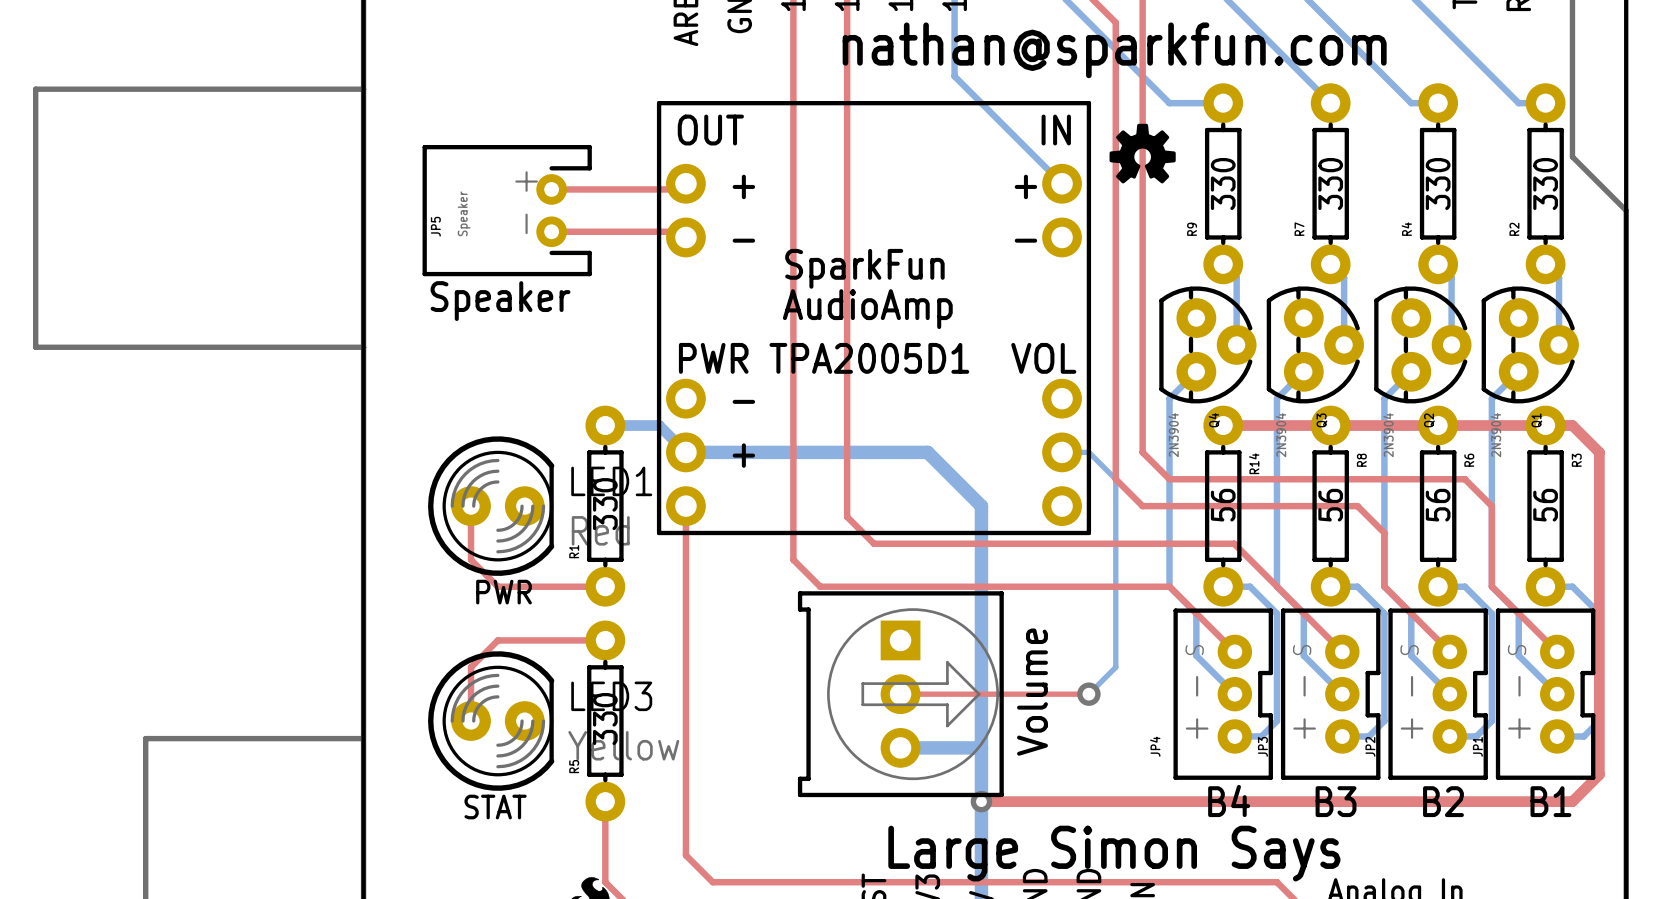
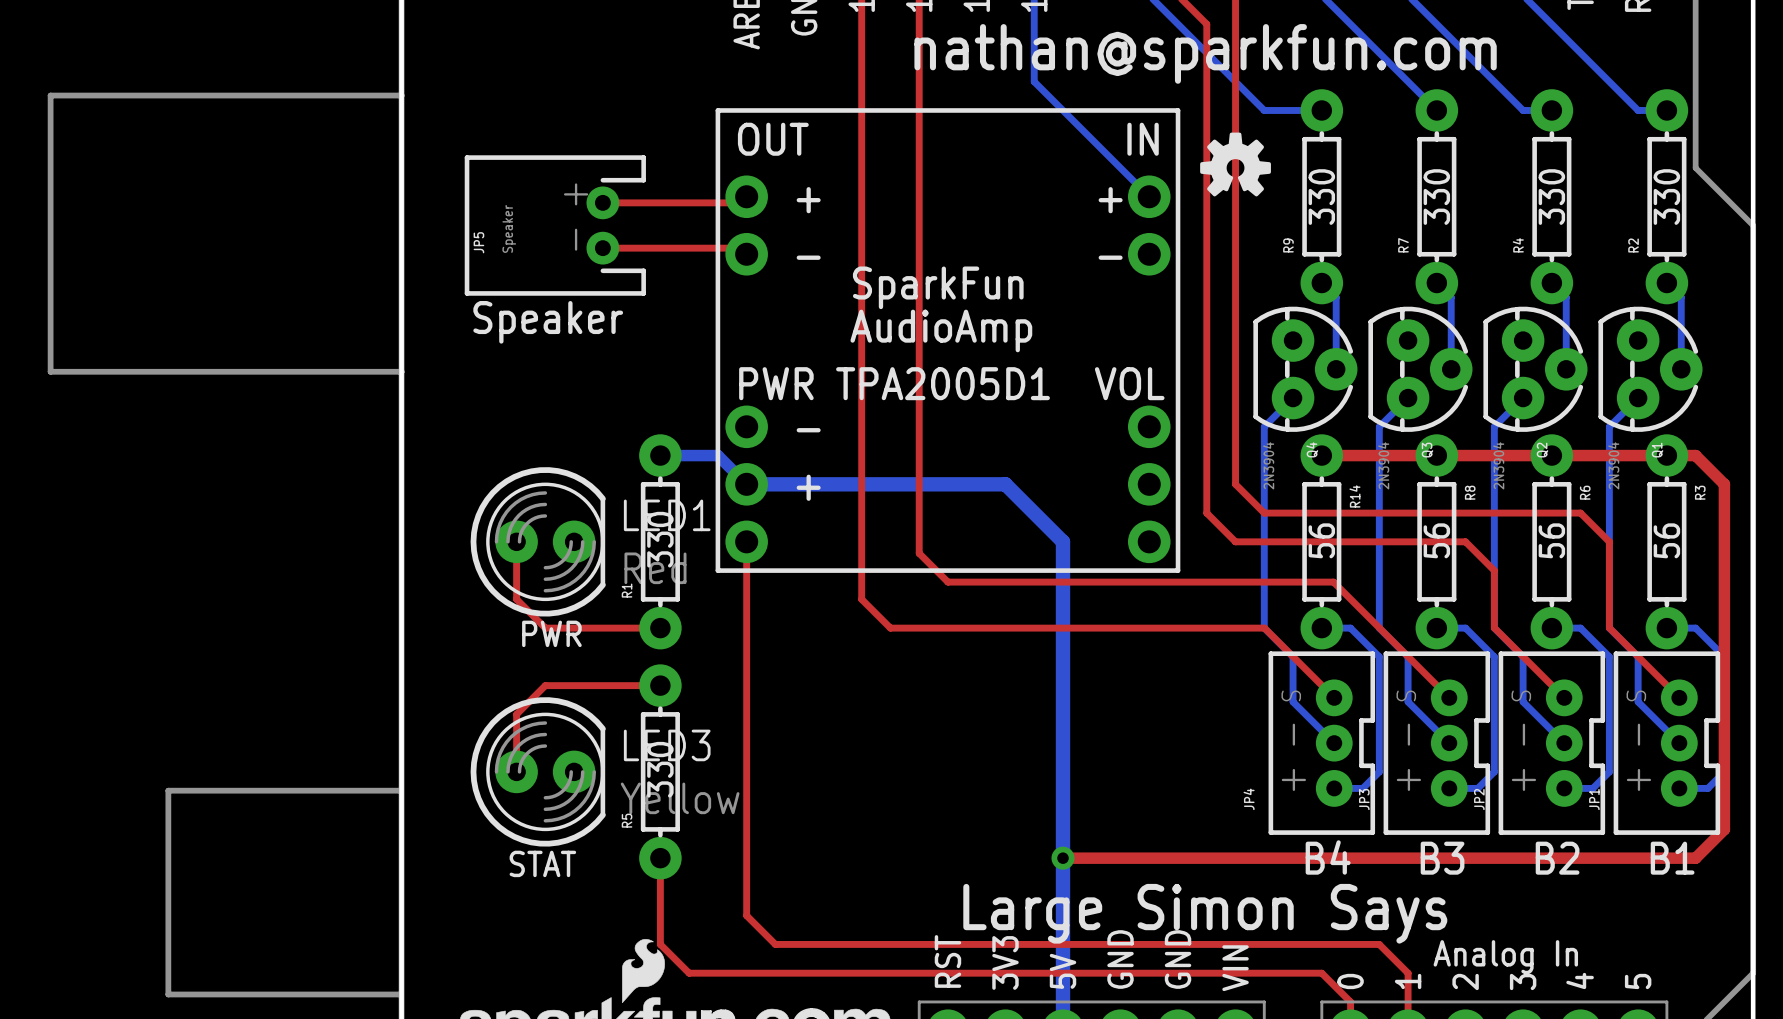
bottom track: (1062, 452) (1088, 452) (1115, 479) (1115, 667) (1088, 694) -> none
text: Volume (1032, 692) -> none
top track: (900, 694) (1088, 694) -> none
part: (900, 694) -> none
via: (1088, 694) -> none
bottom track: (900, 747) (981, 747) -> none

